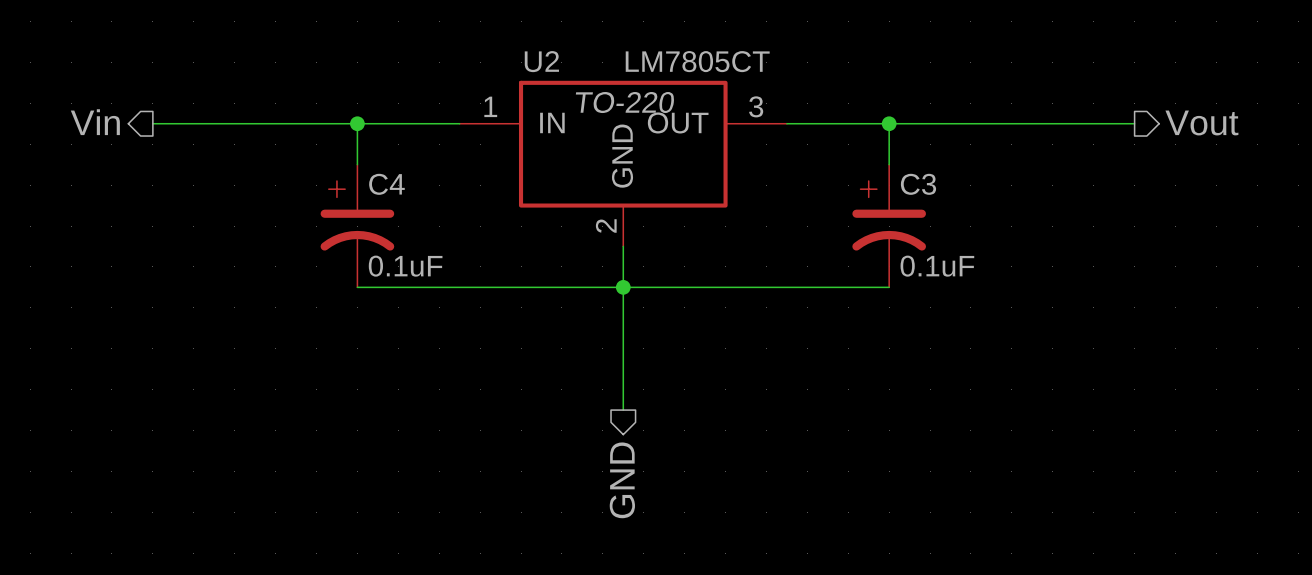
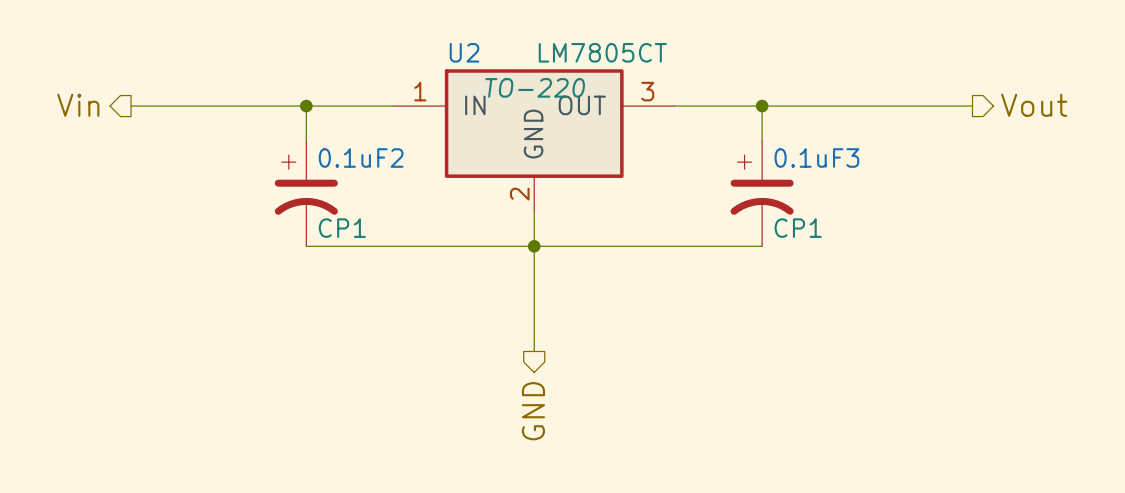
C4 name: C4 (386, 184) -> 0.1uF2 (361, 157)
C3 name: C3 (918, 184) -> 0.1uF3 (816, 157)
C4 value: 0.1uF (405, 266) -> CP1 (342, 228)
C3 value: 0.1uF (937, 266) -> CP1 (798, 228)

